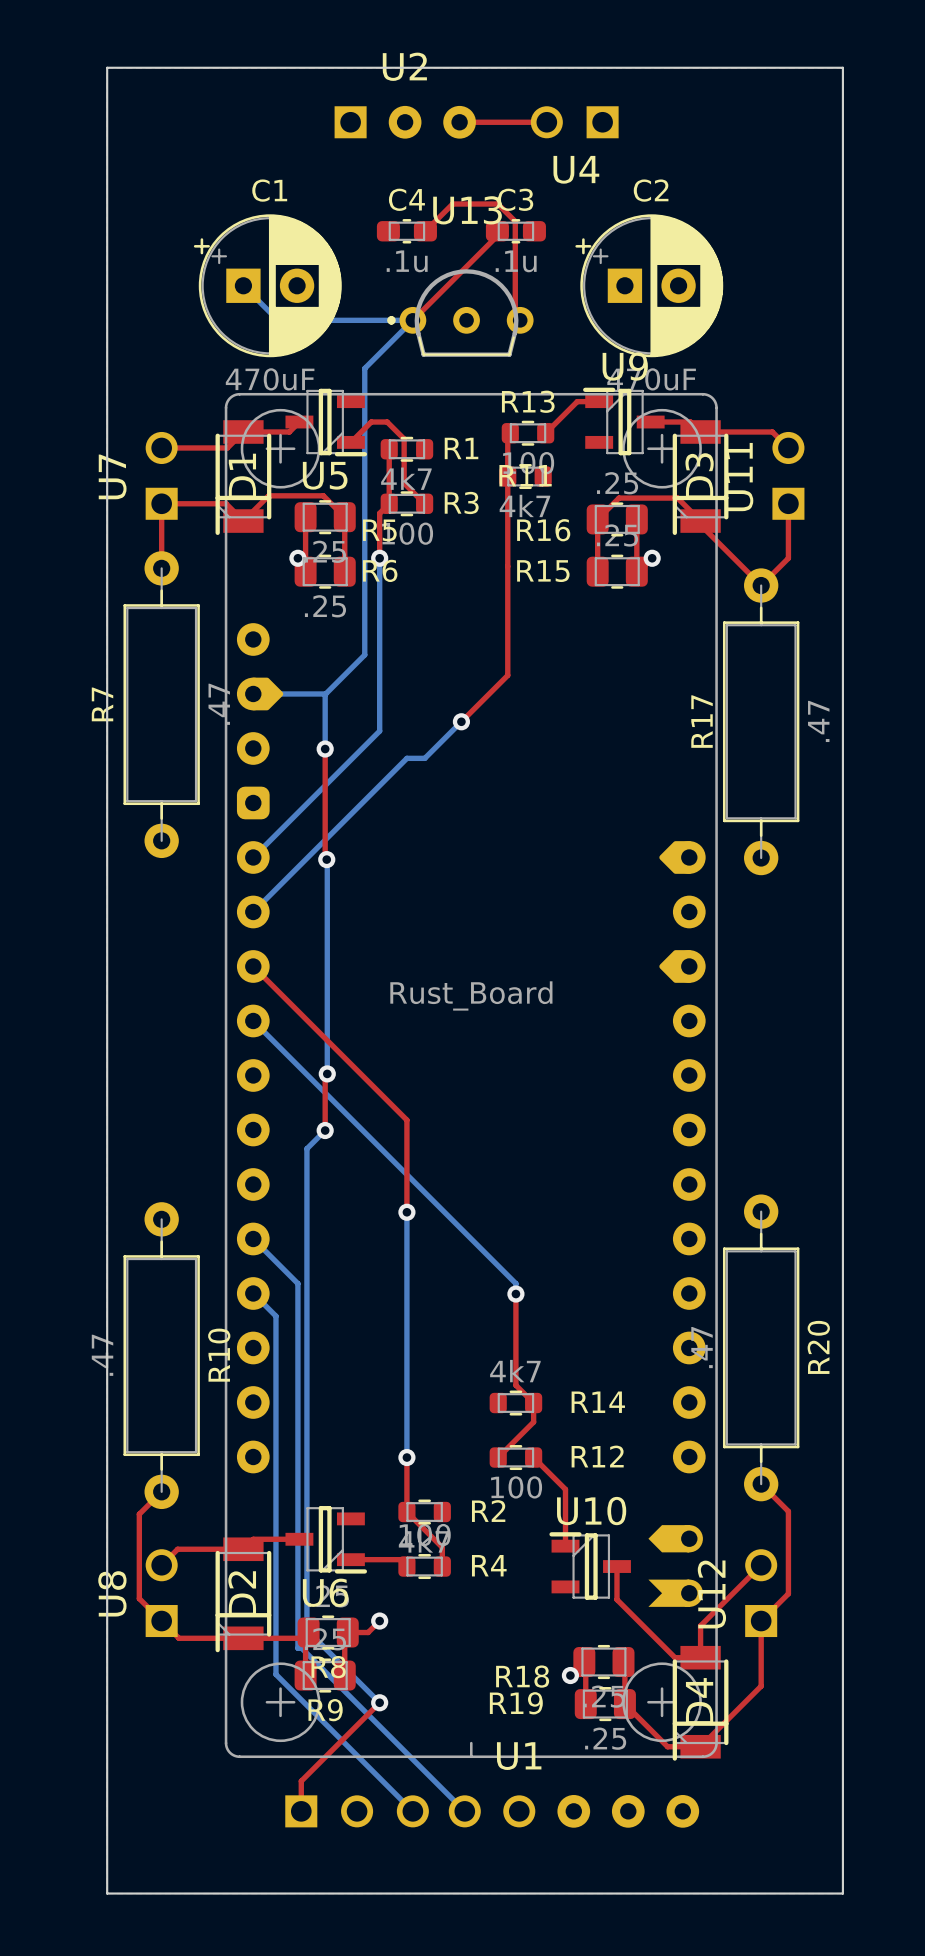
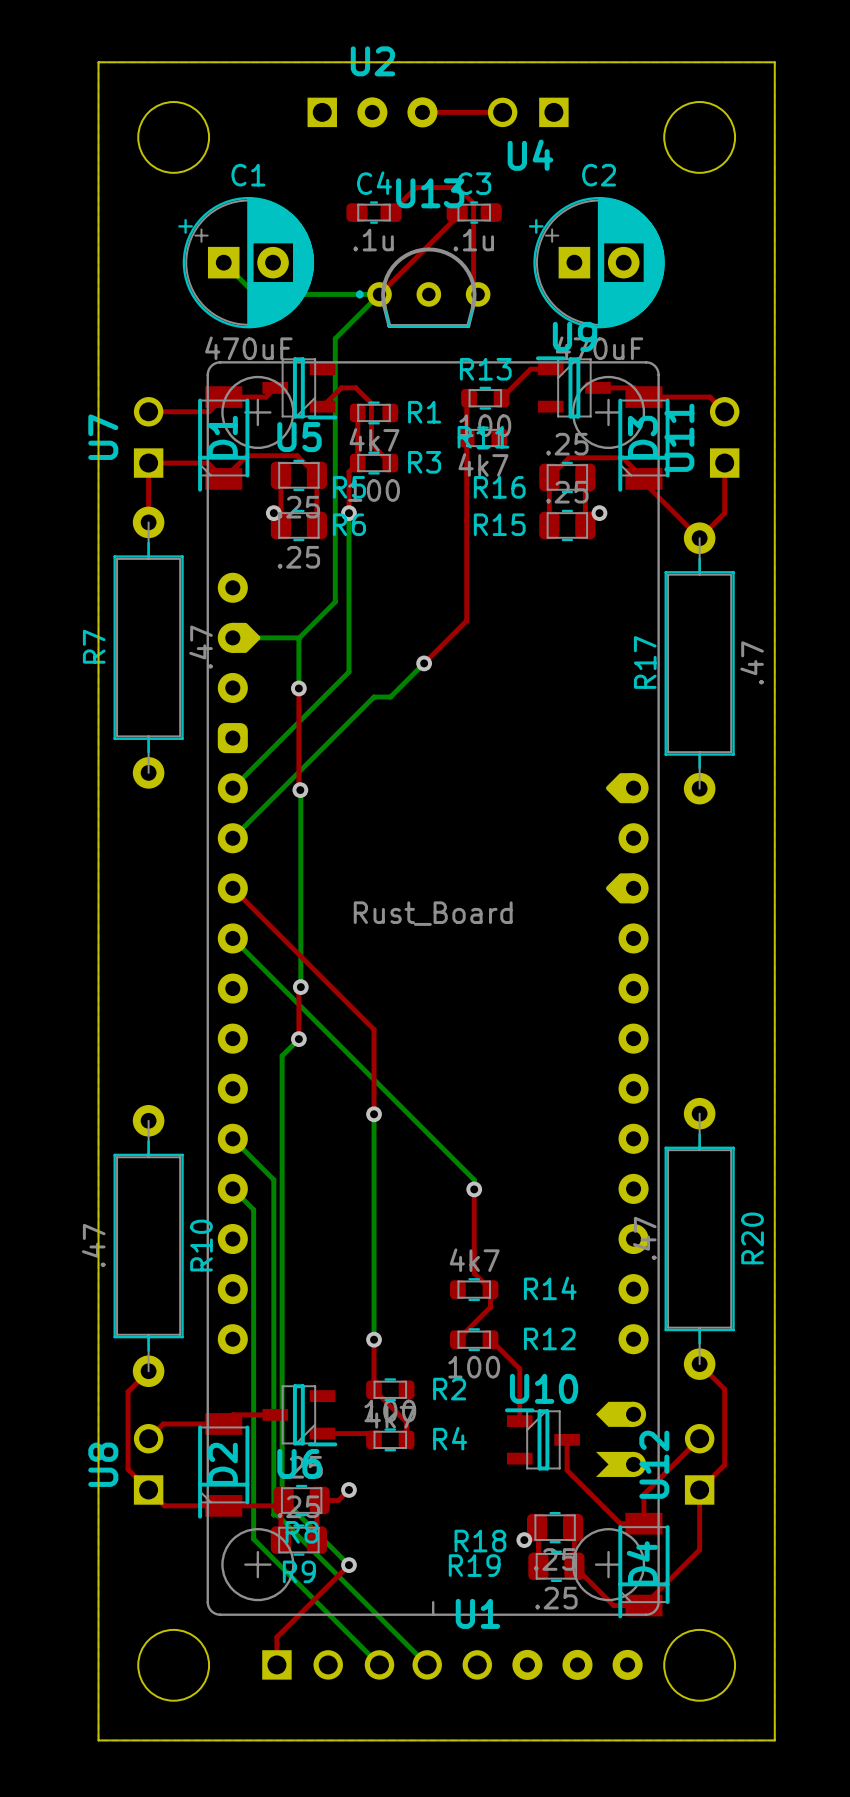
round board edge: none -> [137, 101, 211, 174]
round board edge: none -> [663, 101, 737, 174]
round board edge: none -> [137, 1628, 211, 1702]
round board edge: none -> [663, 1628, 737, 1702]

